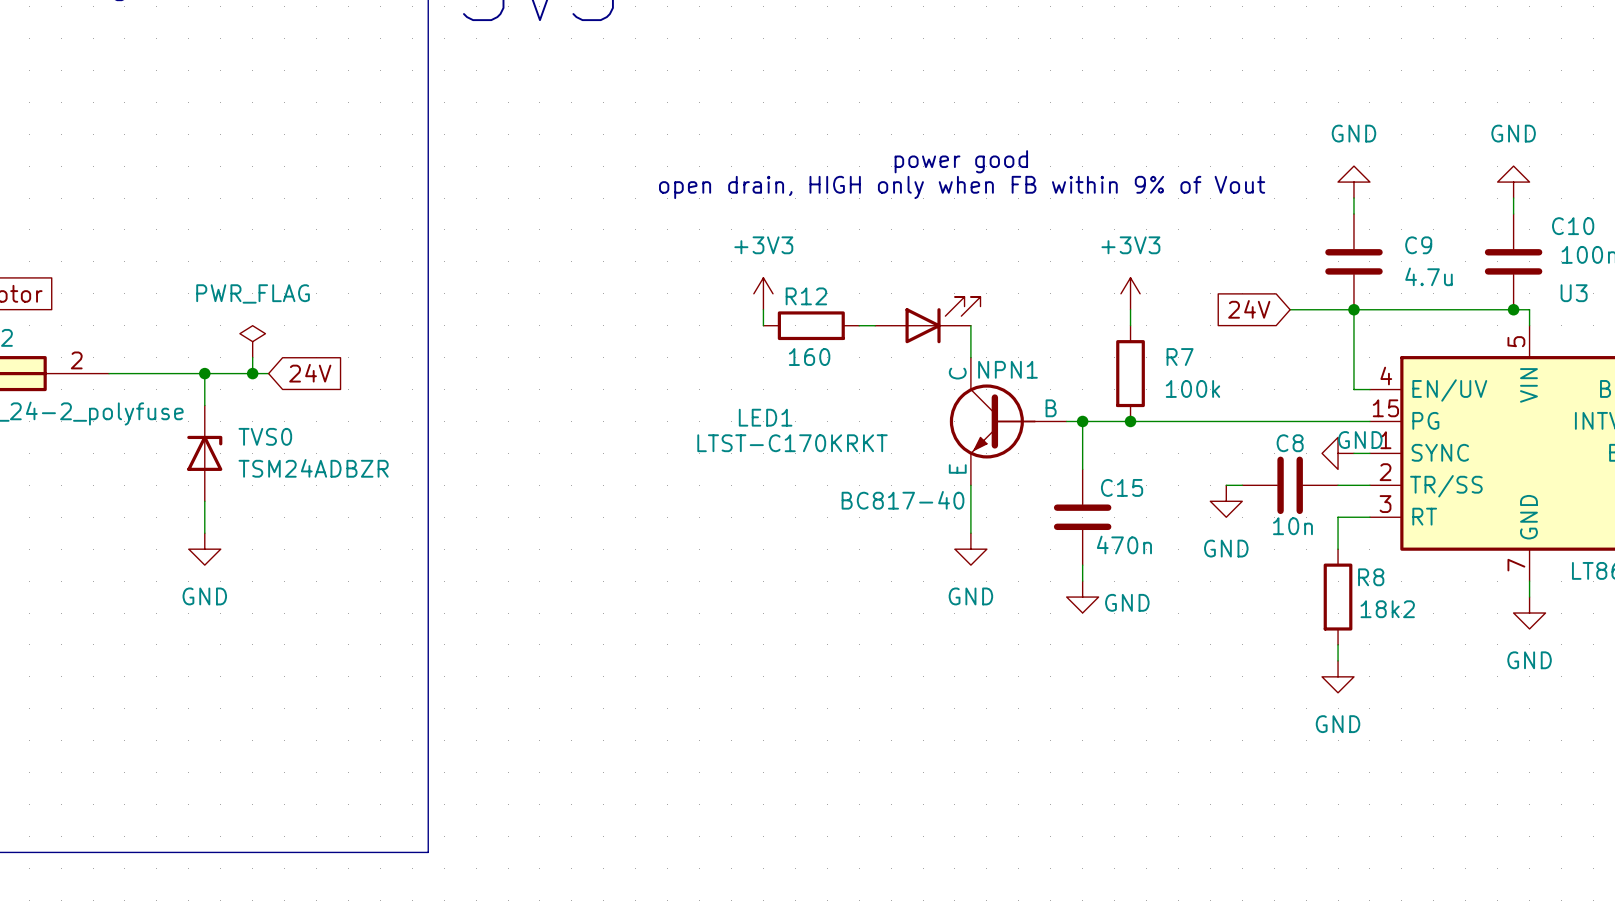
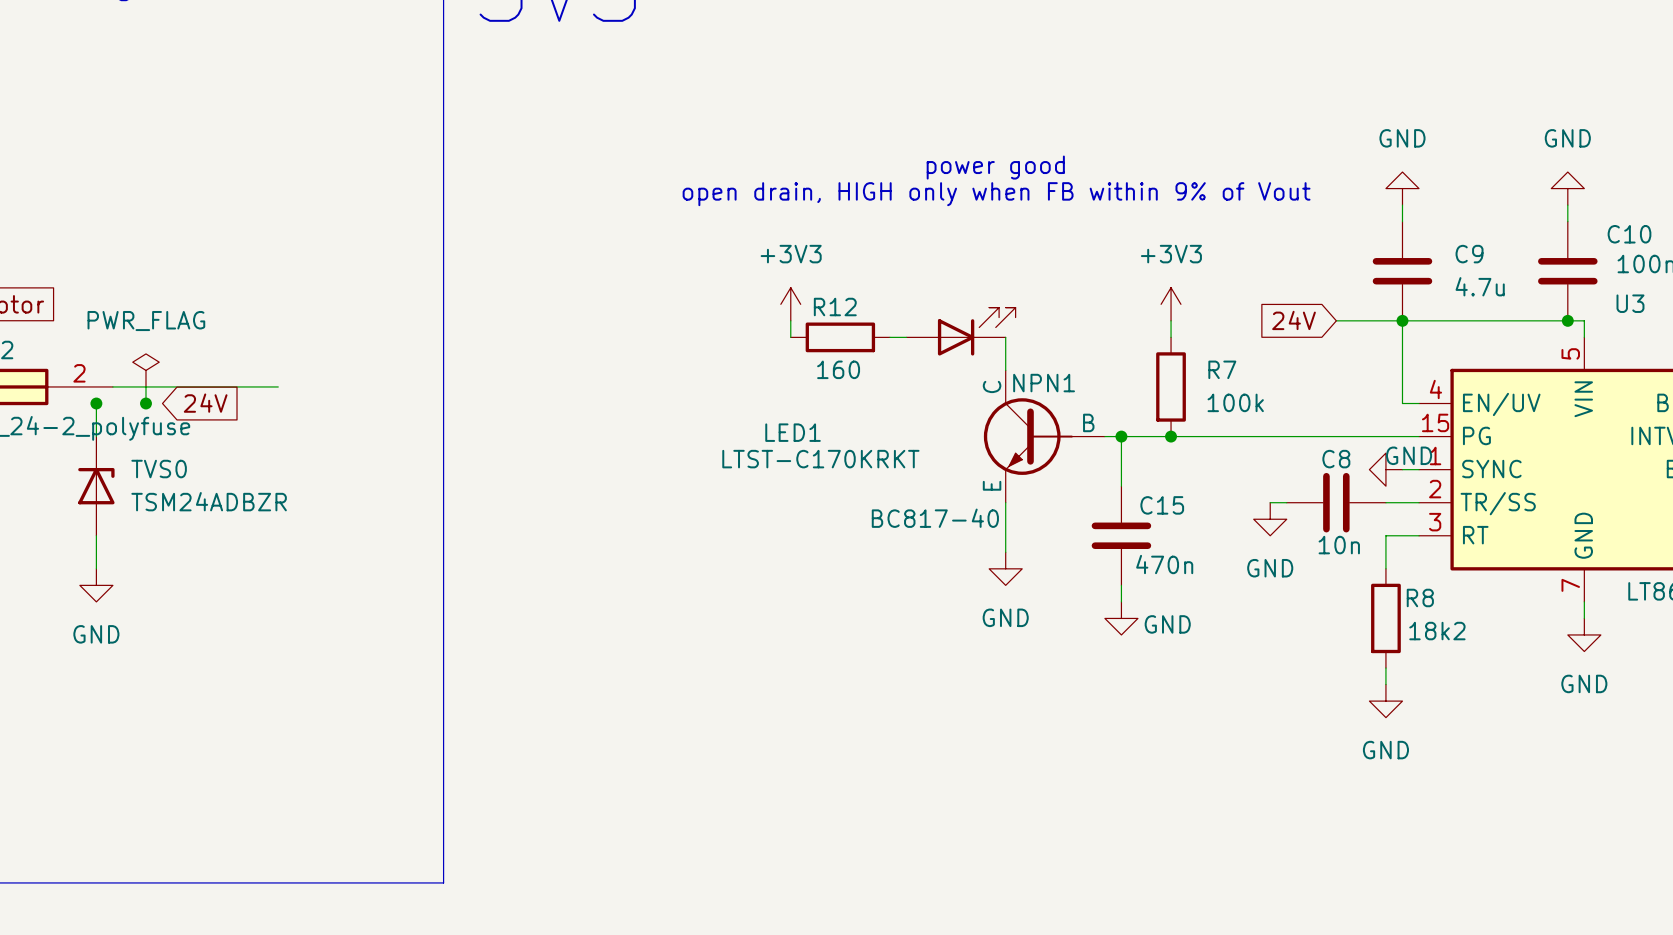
power symbol position: PWR_FLAG (252, 341) -> PWR_FLAG (145, 370)
wire: (252, 357) (252, 373) -> (145, 386) (145, 403)
wire: (204, 373) (204, 405) -> (96, 403) (96, 436)
junction: (204, 373) -> none
junction: (252, 373) -> none
global label position: 24V (310, 373) -> 24V (205, 403)
junction: none -> (96, 403)
junction: none -> (145, 403)
TVS0 position: (204, 453) -> (96, 486)
wire: (204, 501) (204, 533) -> (96, 535) (96, 568)
power symbol position: GND (204, 549) -> GND (96, 585)

